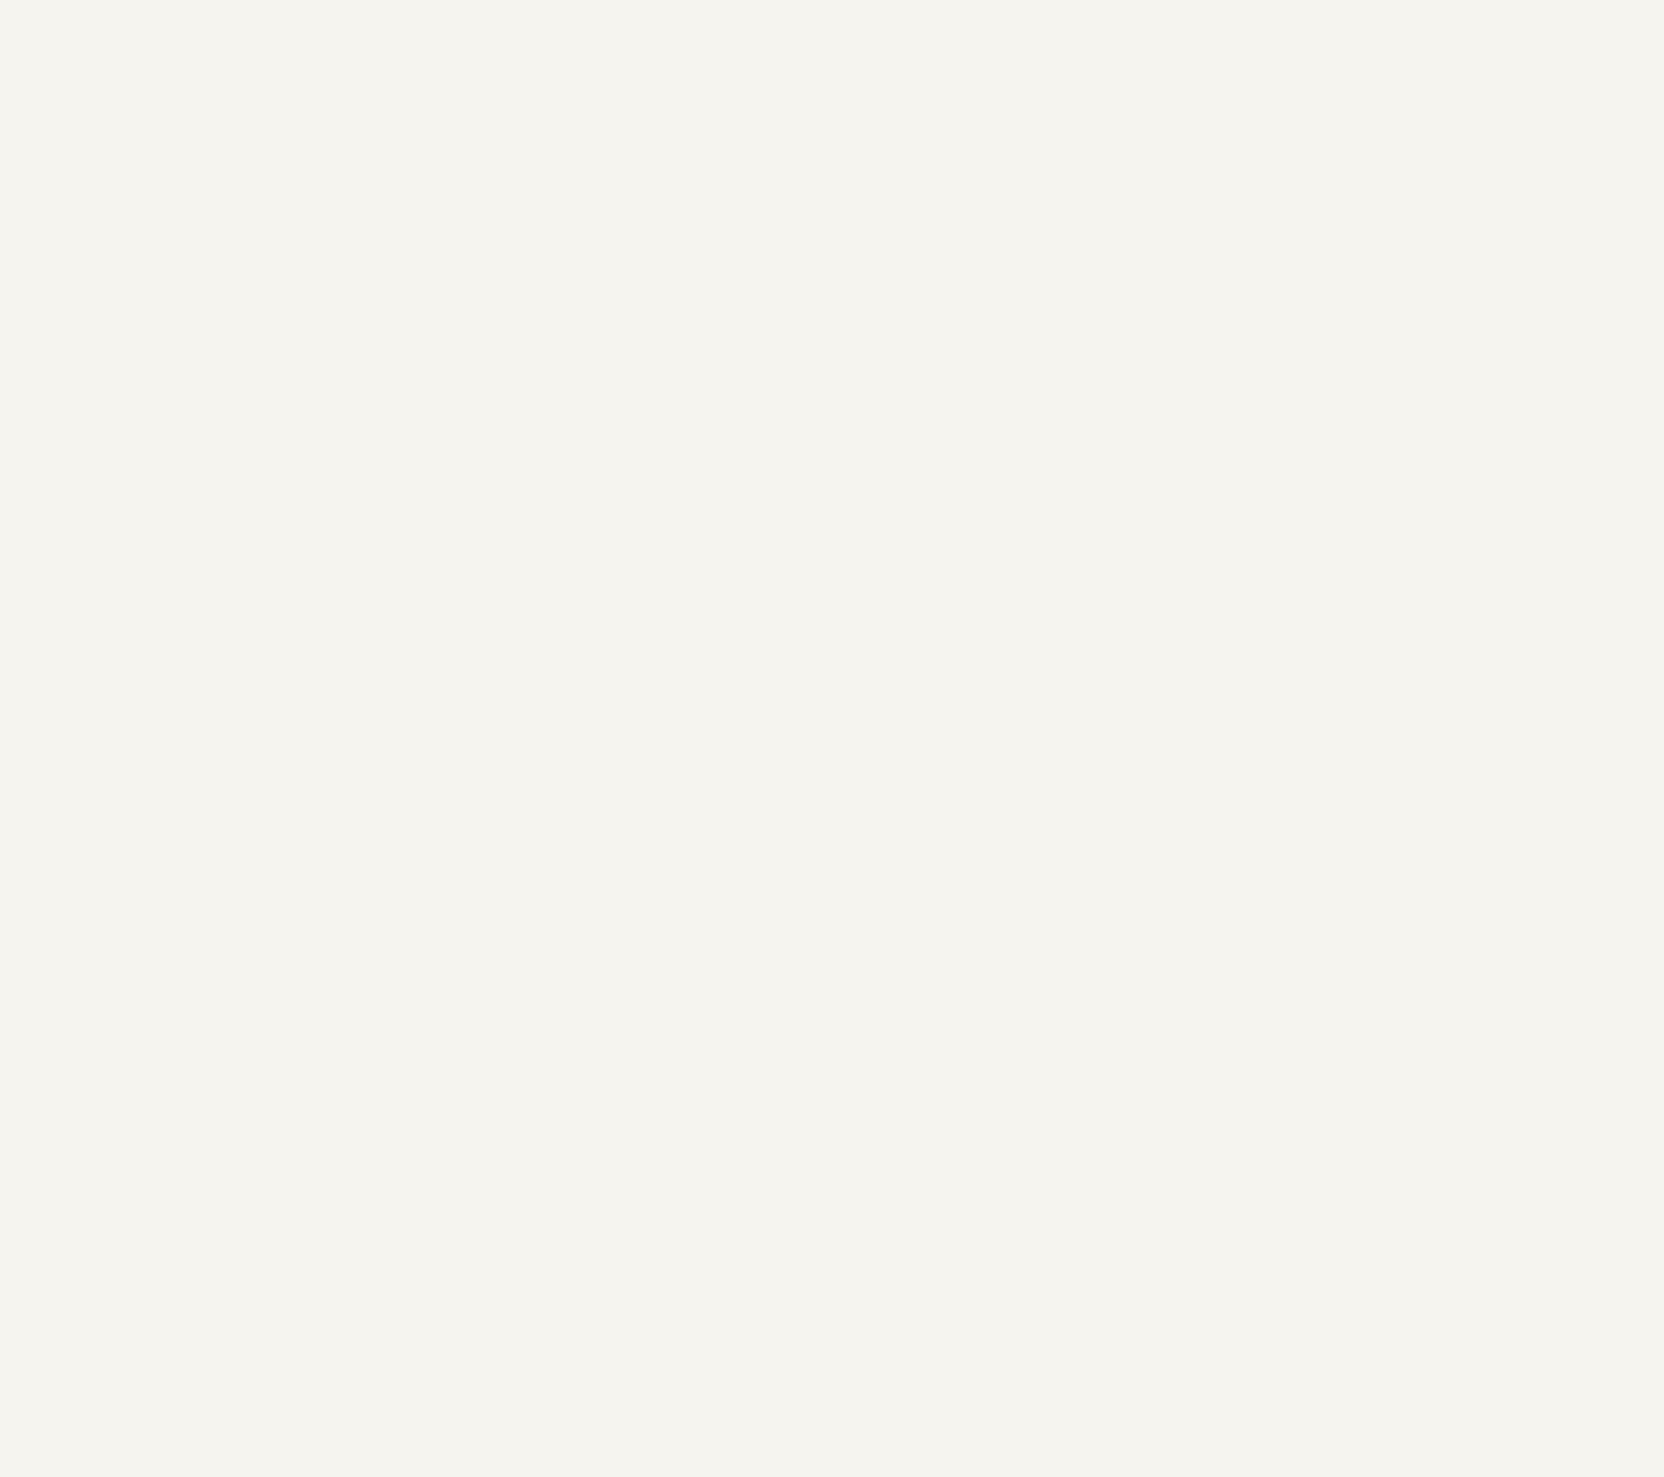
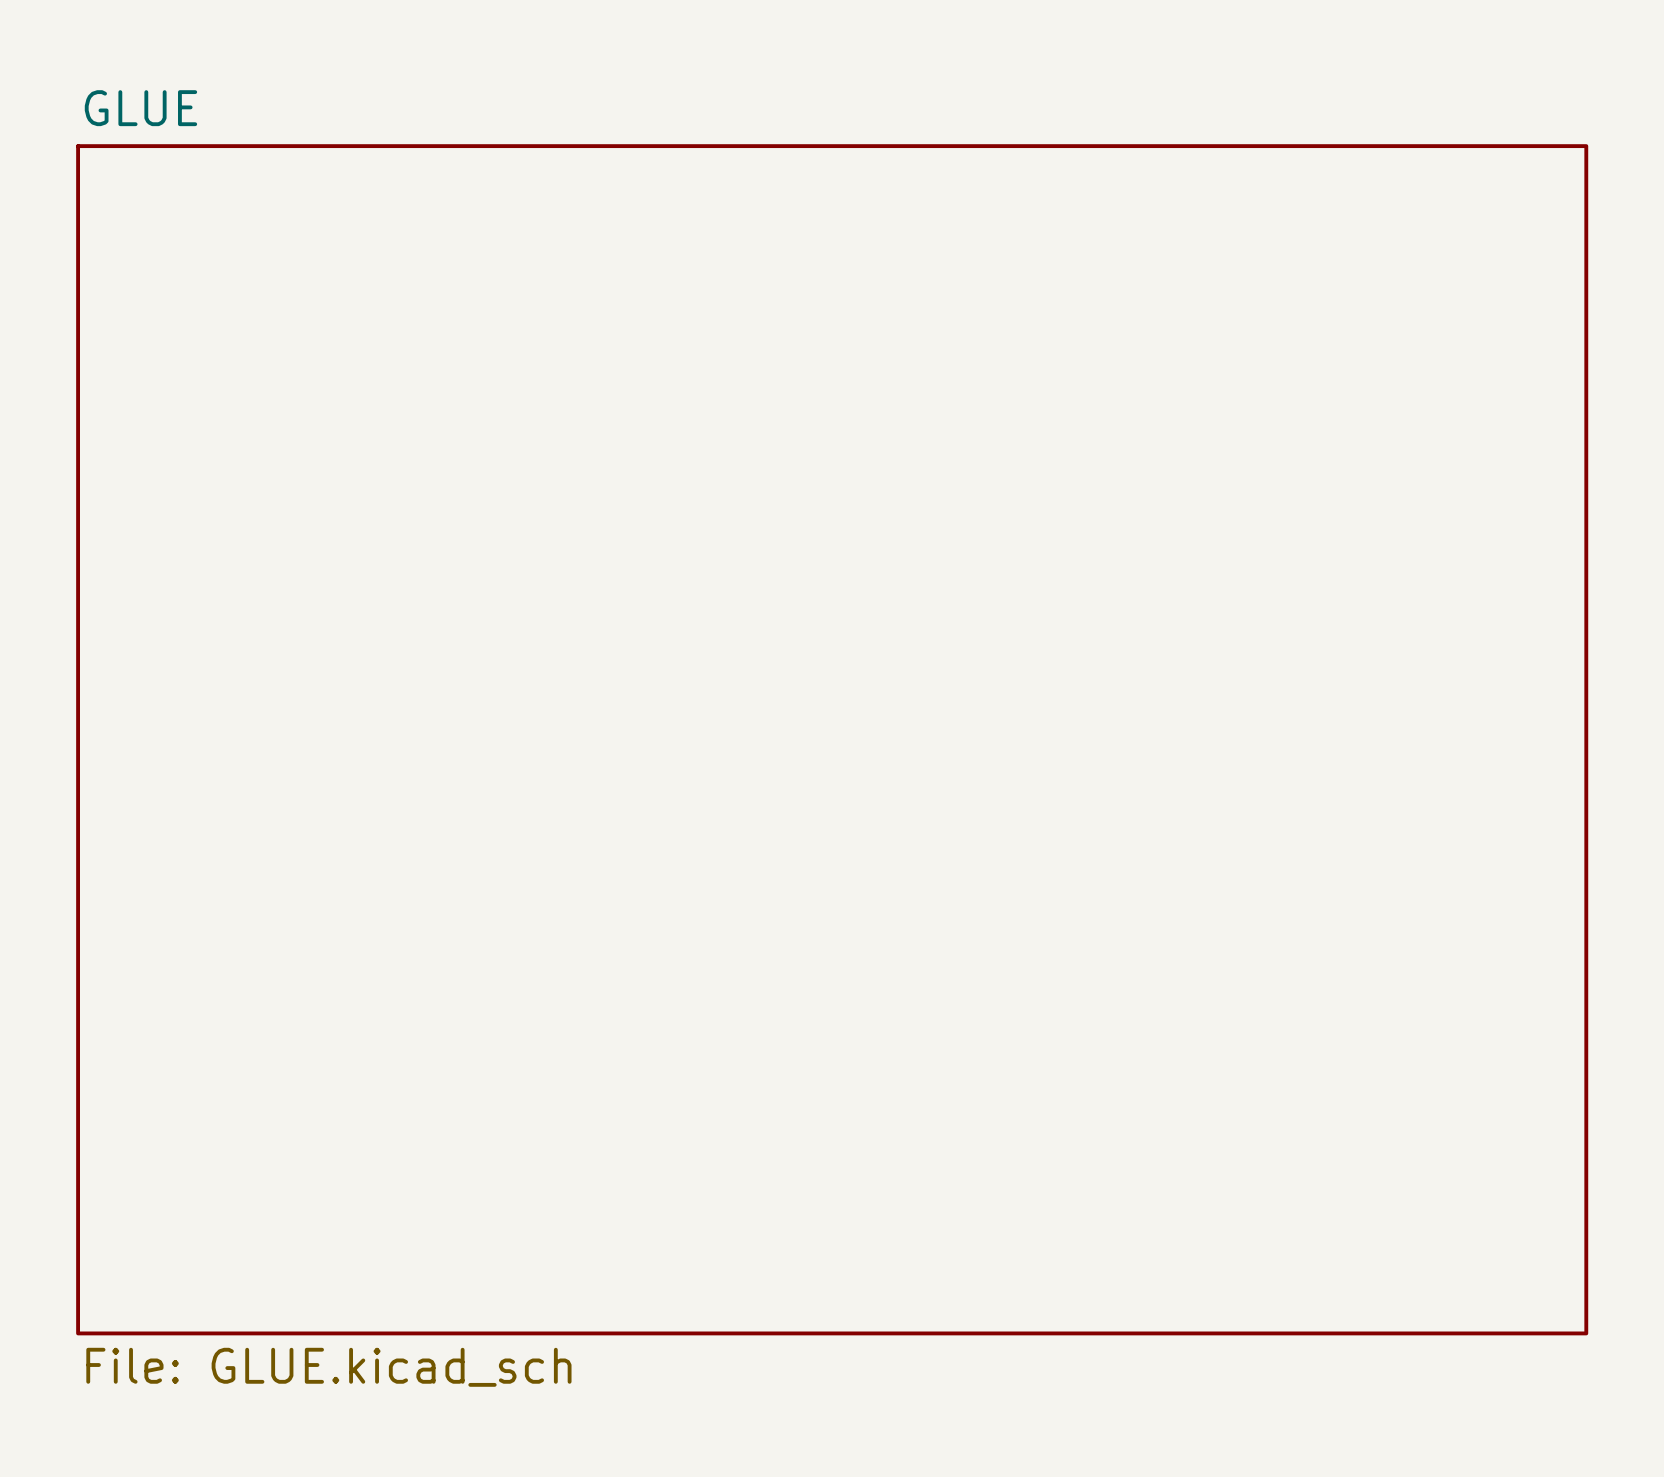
sheet GLUE: none -> File: GLUE.kicad_sch (832, 739)

